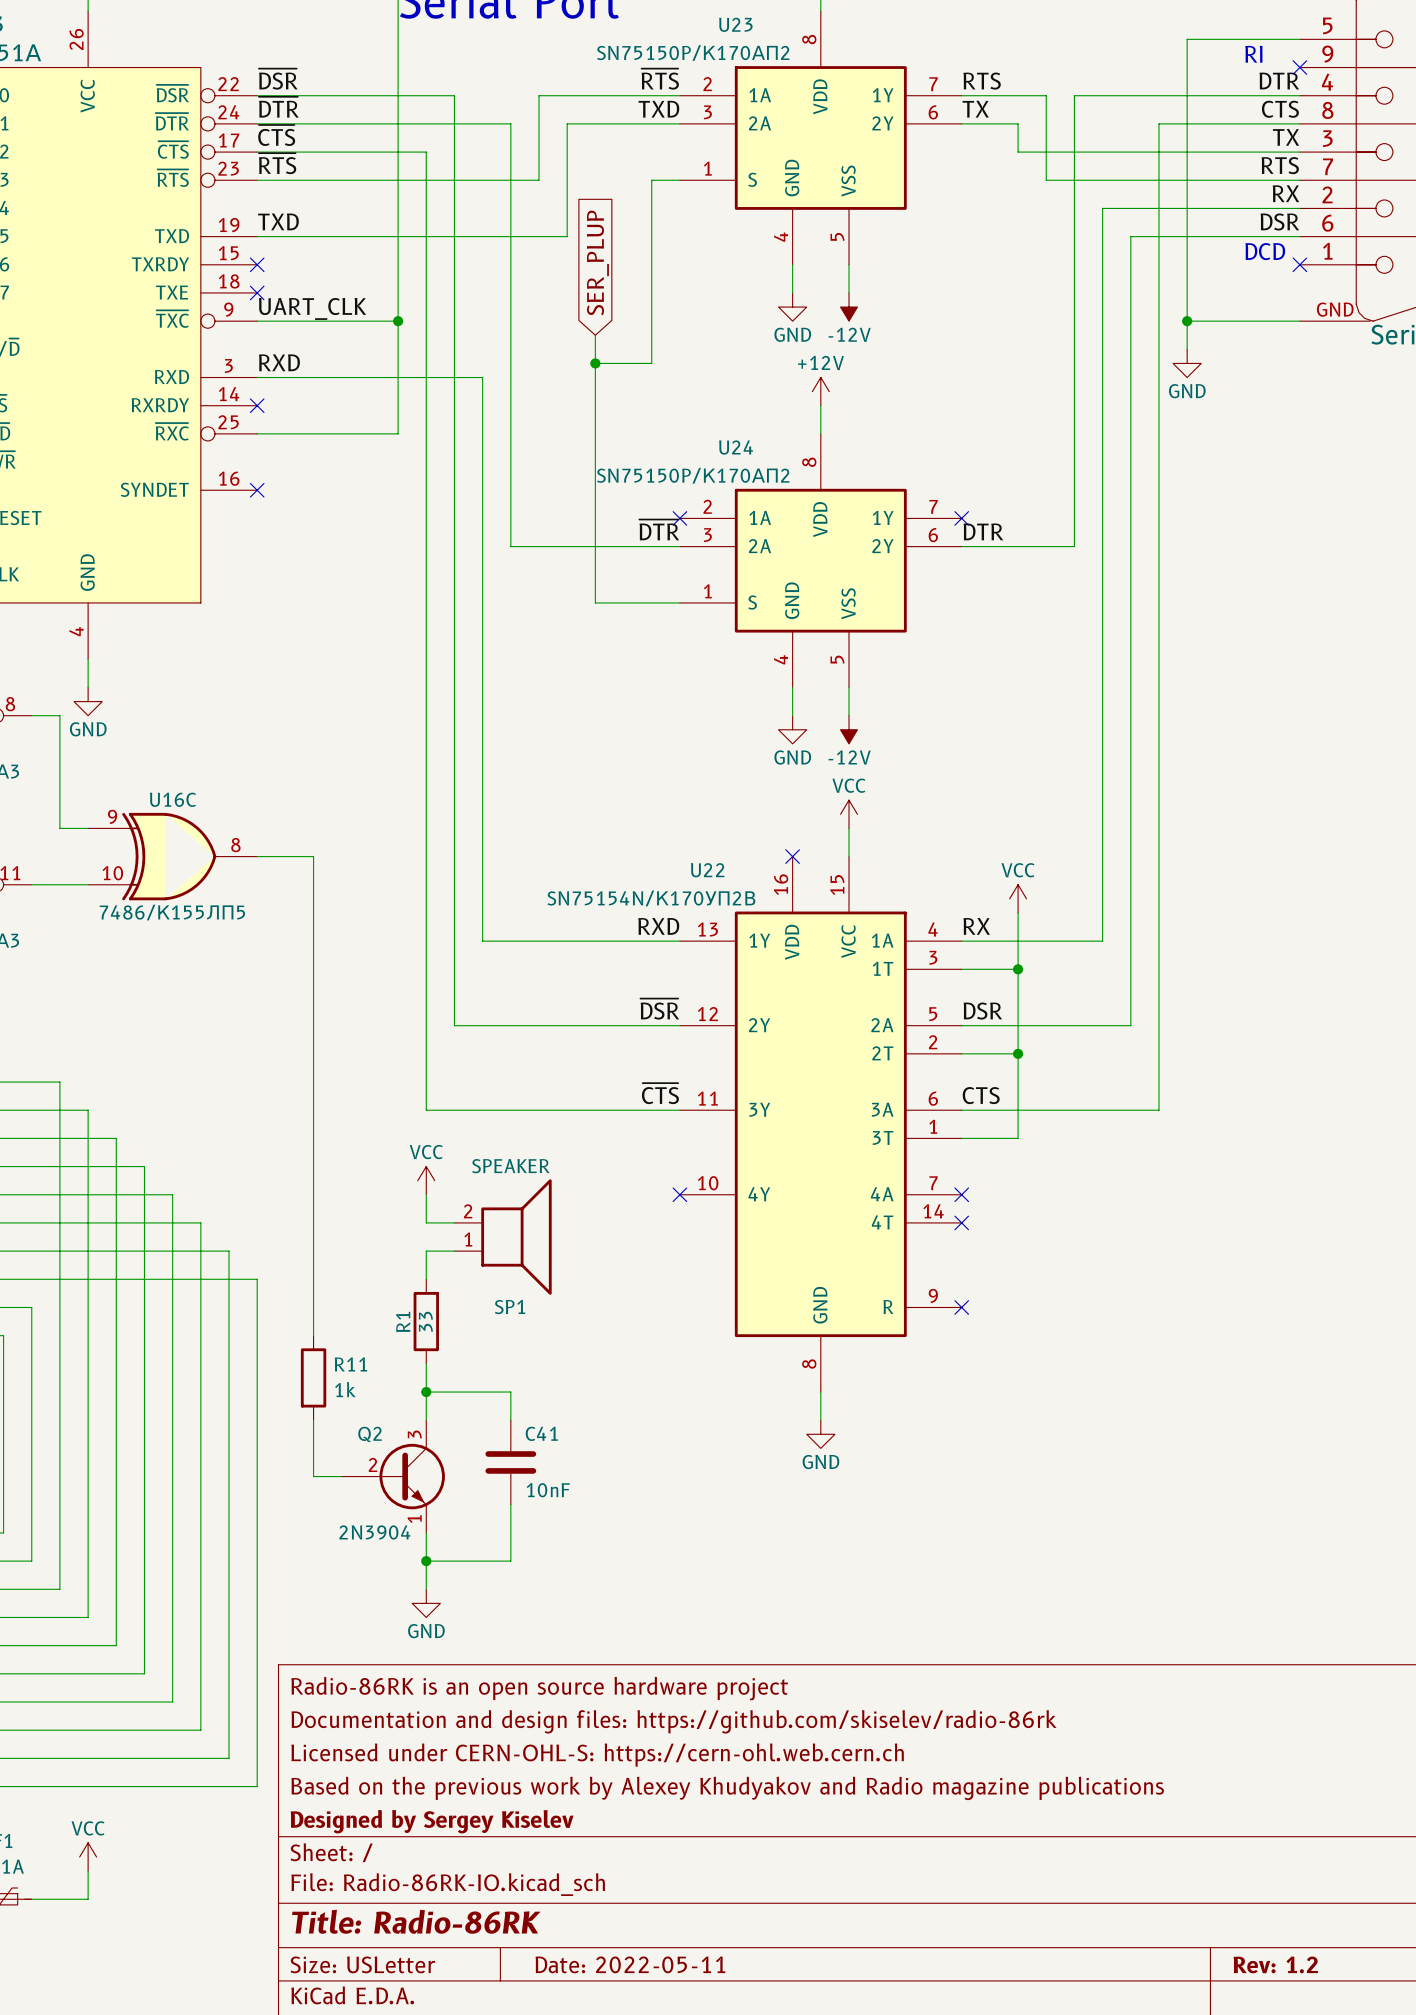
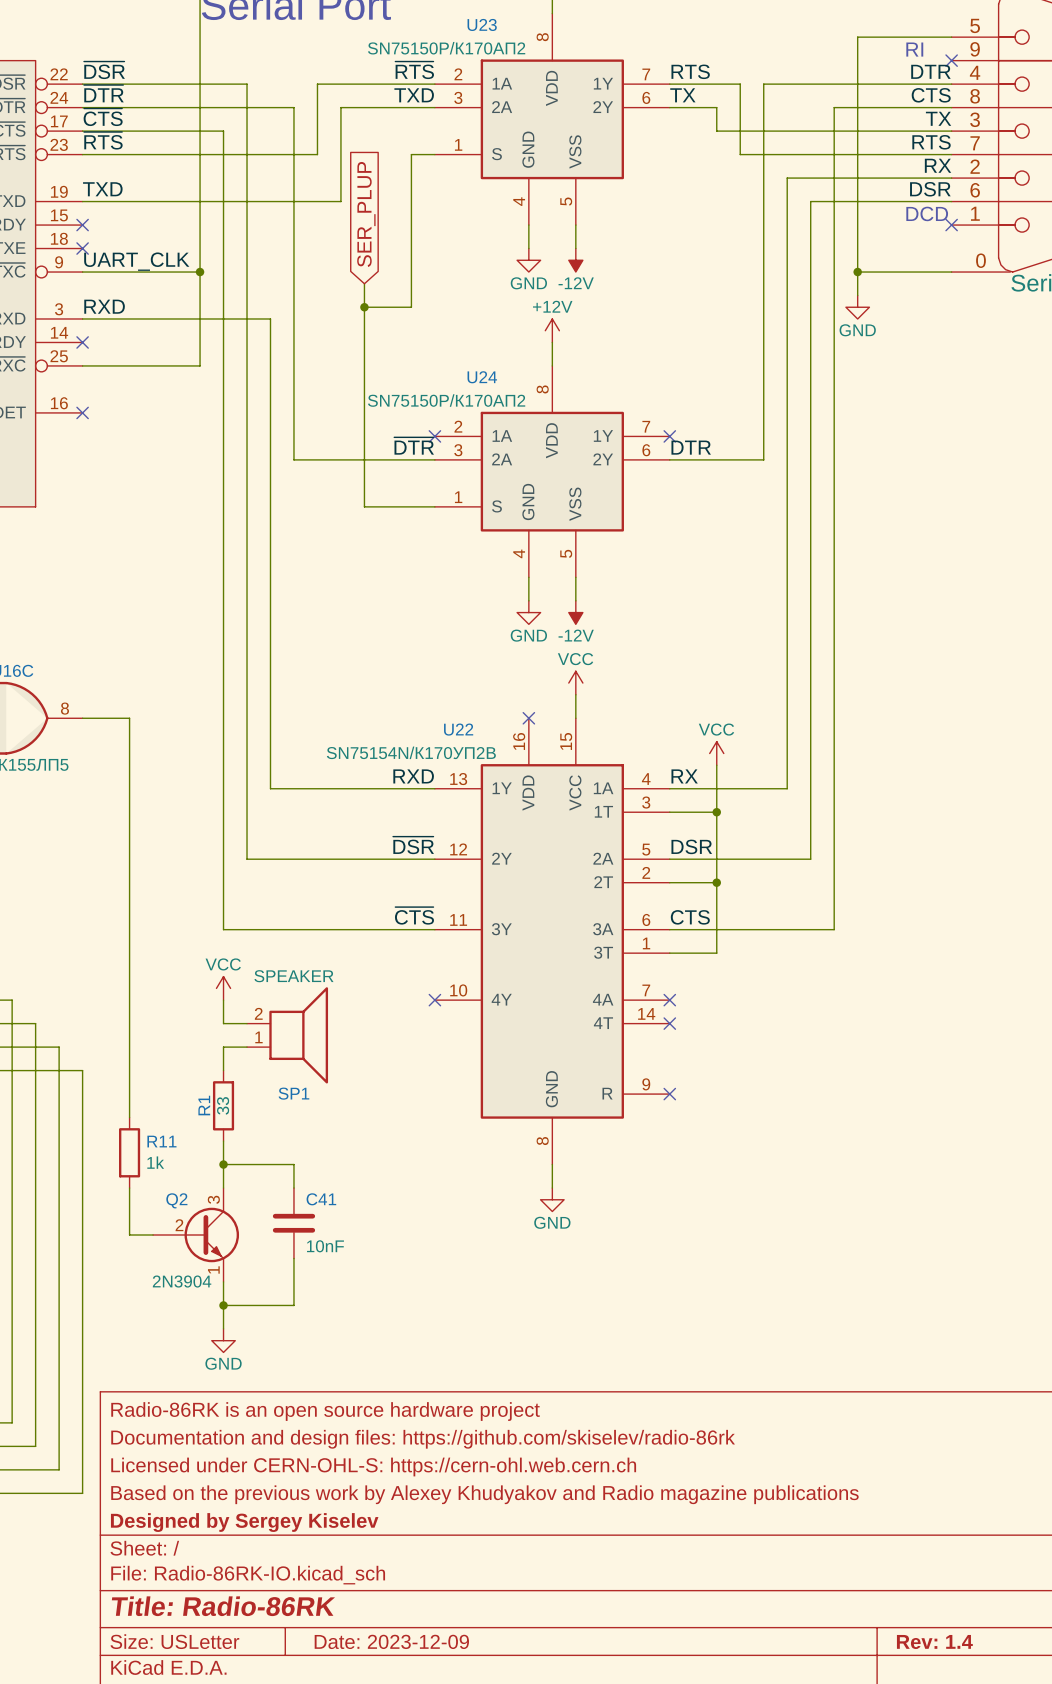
part pin number: GND (1335, 309) -> 0 (980, 260)
title block: Date: 2022-05-11 (630, 1964) -> Date: 2023-12-09 (391, 1641)
title block: Rev: 1.2 (1275, 1964) -> Rev: 1.4 (934, 1642)

